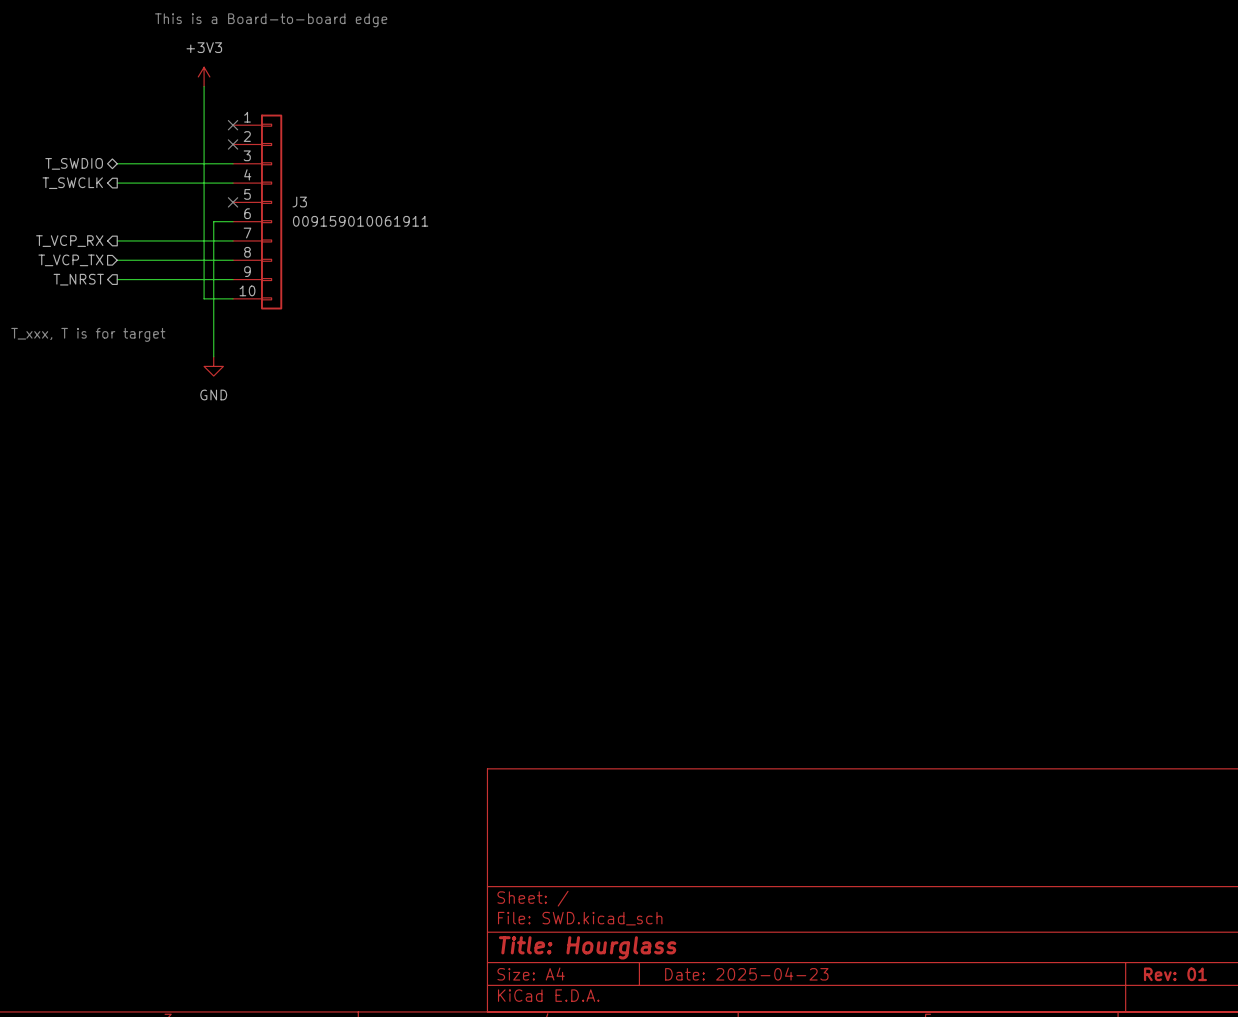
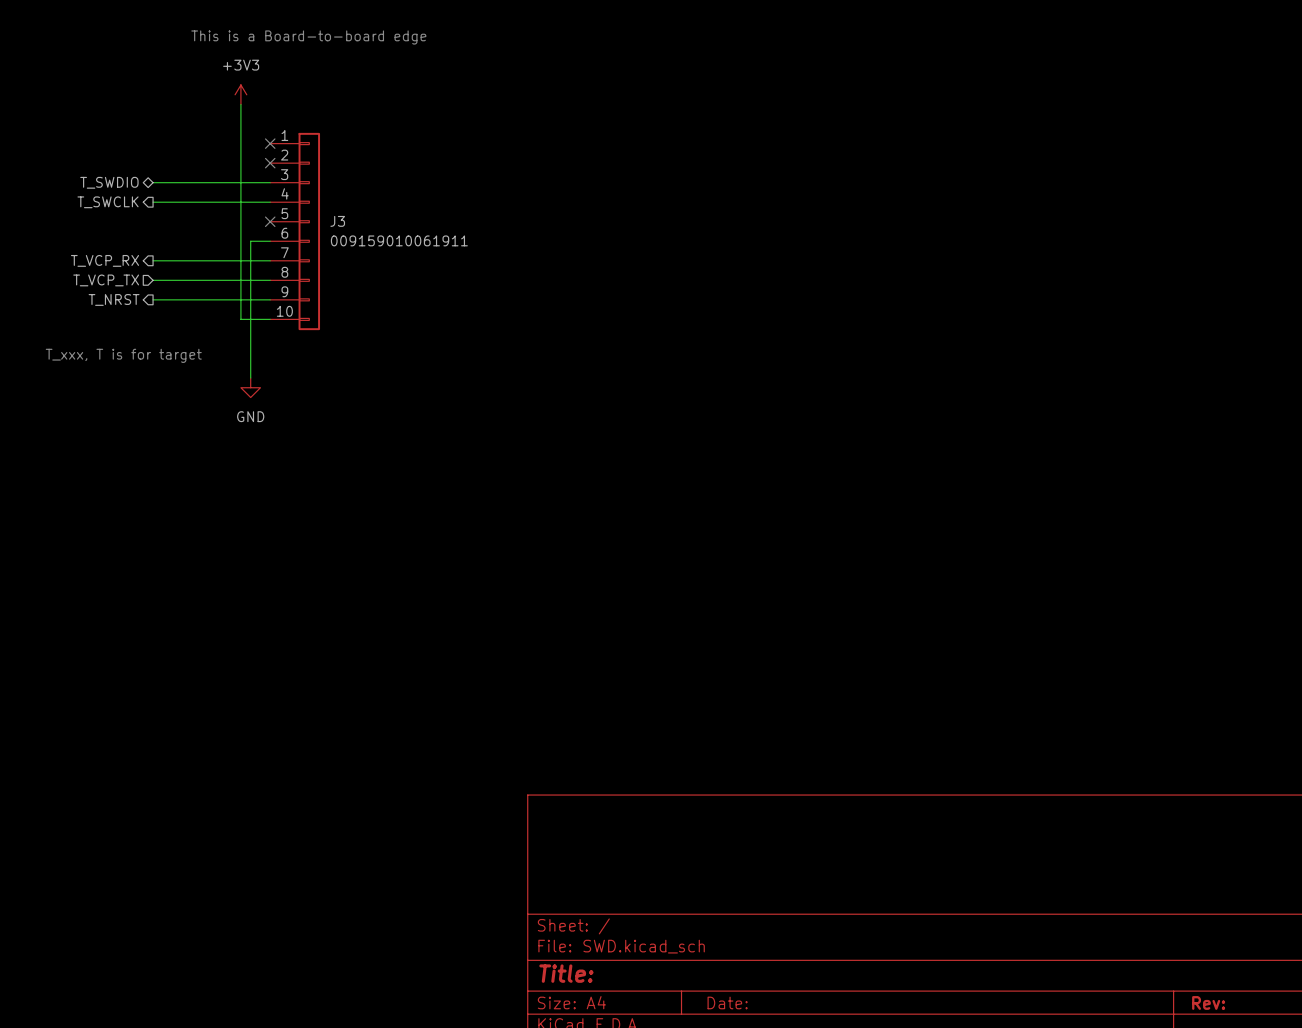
title block: Title: Hourglass (587, 947) -> Title: (566, 973)
title block: Date: 2025-04-23 (746, 974) -> Date: (727, 1002)
title block: Rev: 01 (1175, 974) -> Rev: (1208, 1002)

